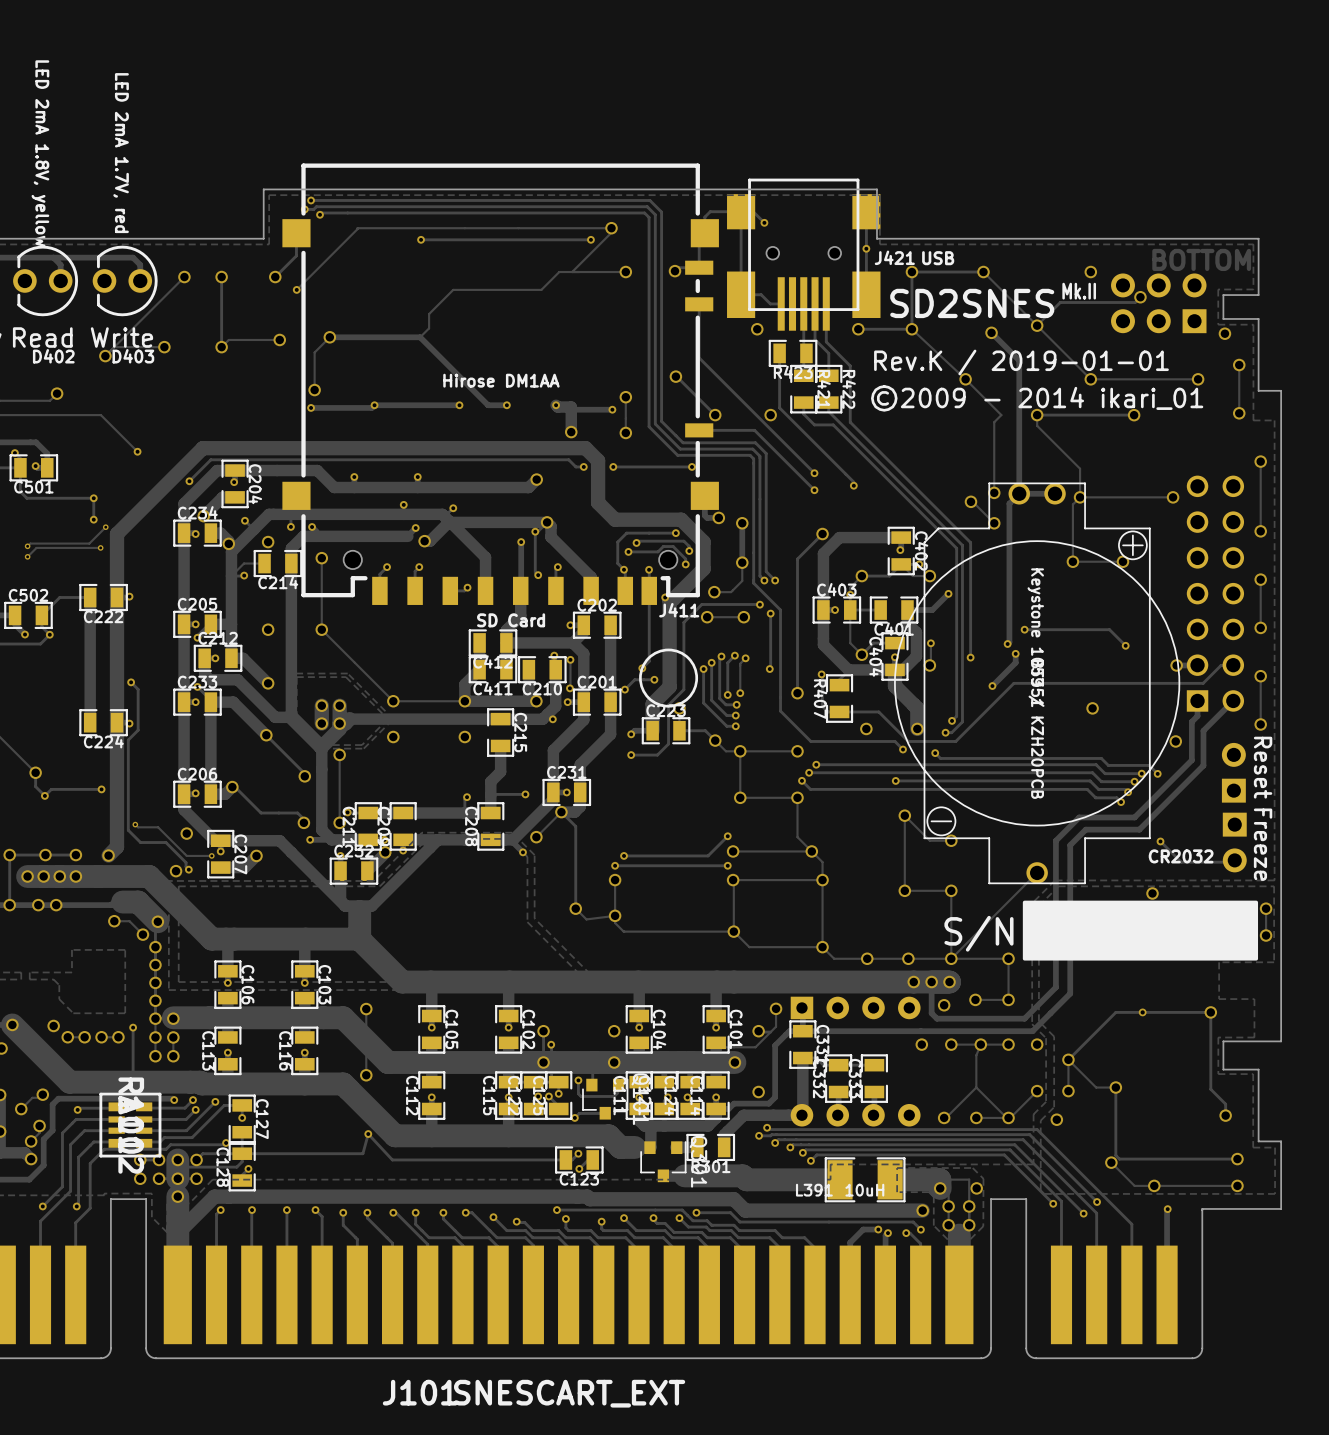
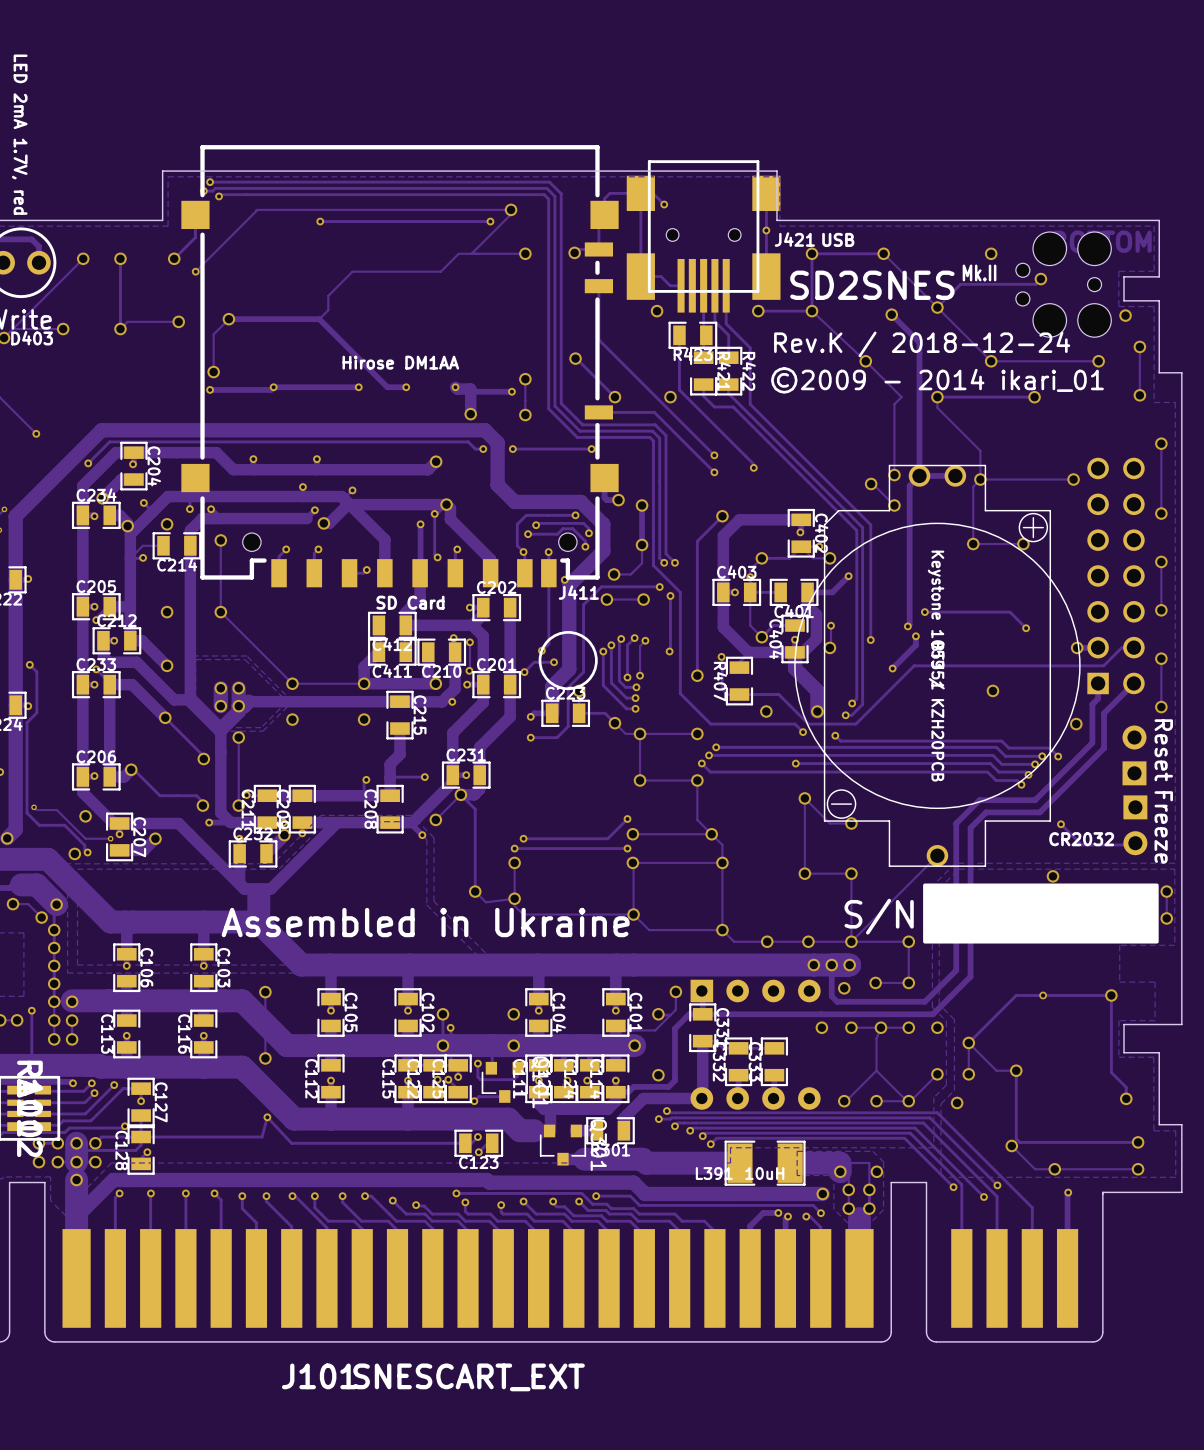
part footprint: [1111, 273, 1207, 334] -> [1015, 232, 1112, 338]
text: Rev.K / 2019-01-01 (1021, 362) -> Rev.K / 2018-12-24 (922, 344)
text: none -> Assembled in Ukraine (425, 922)

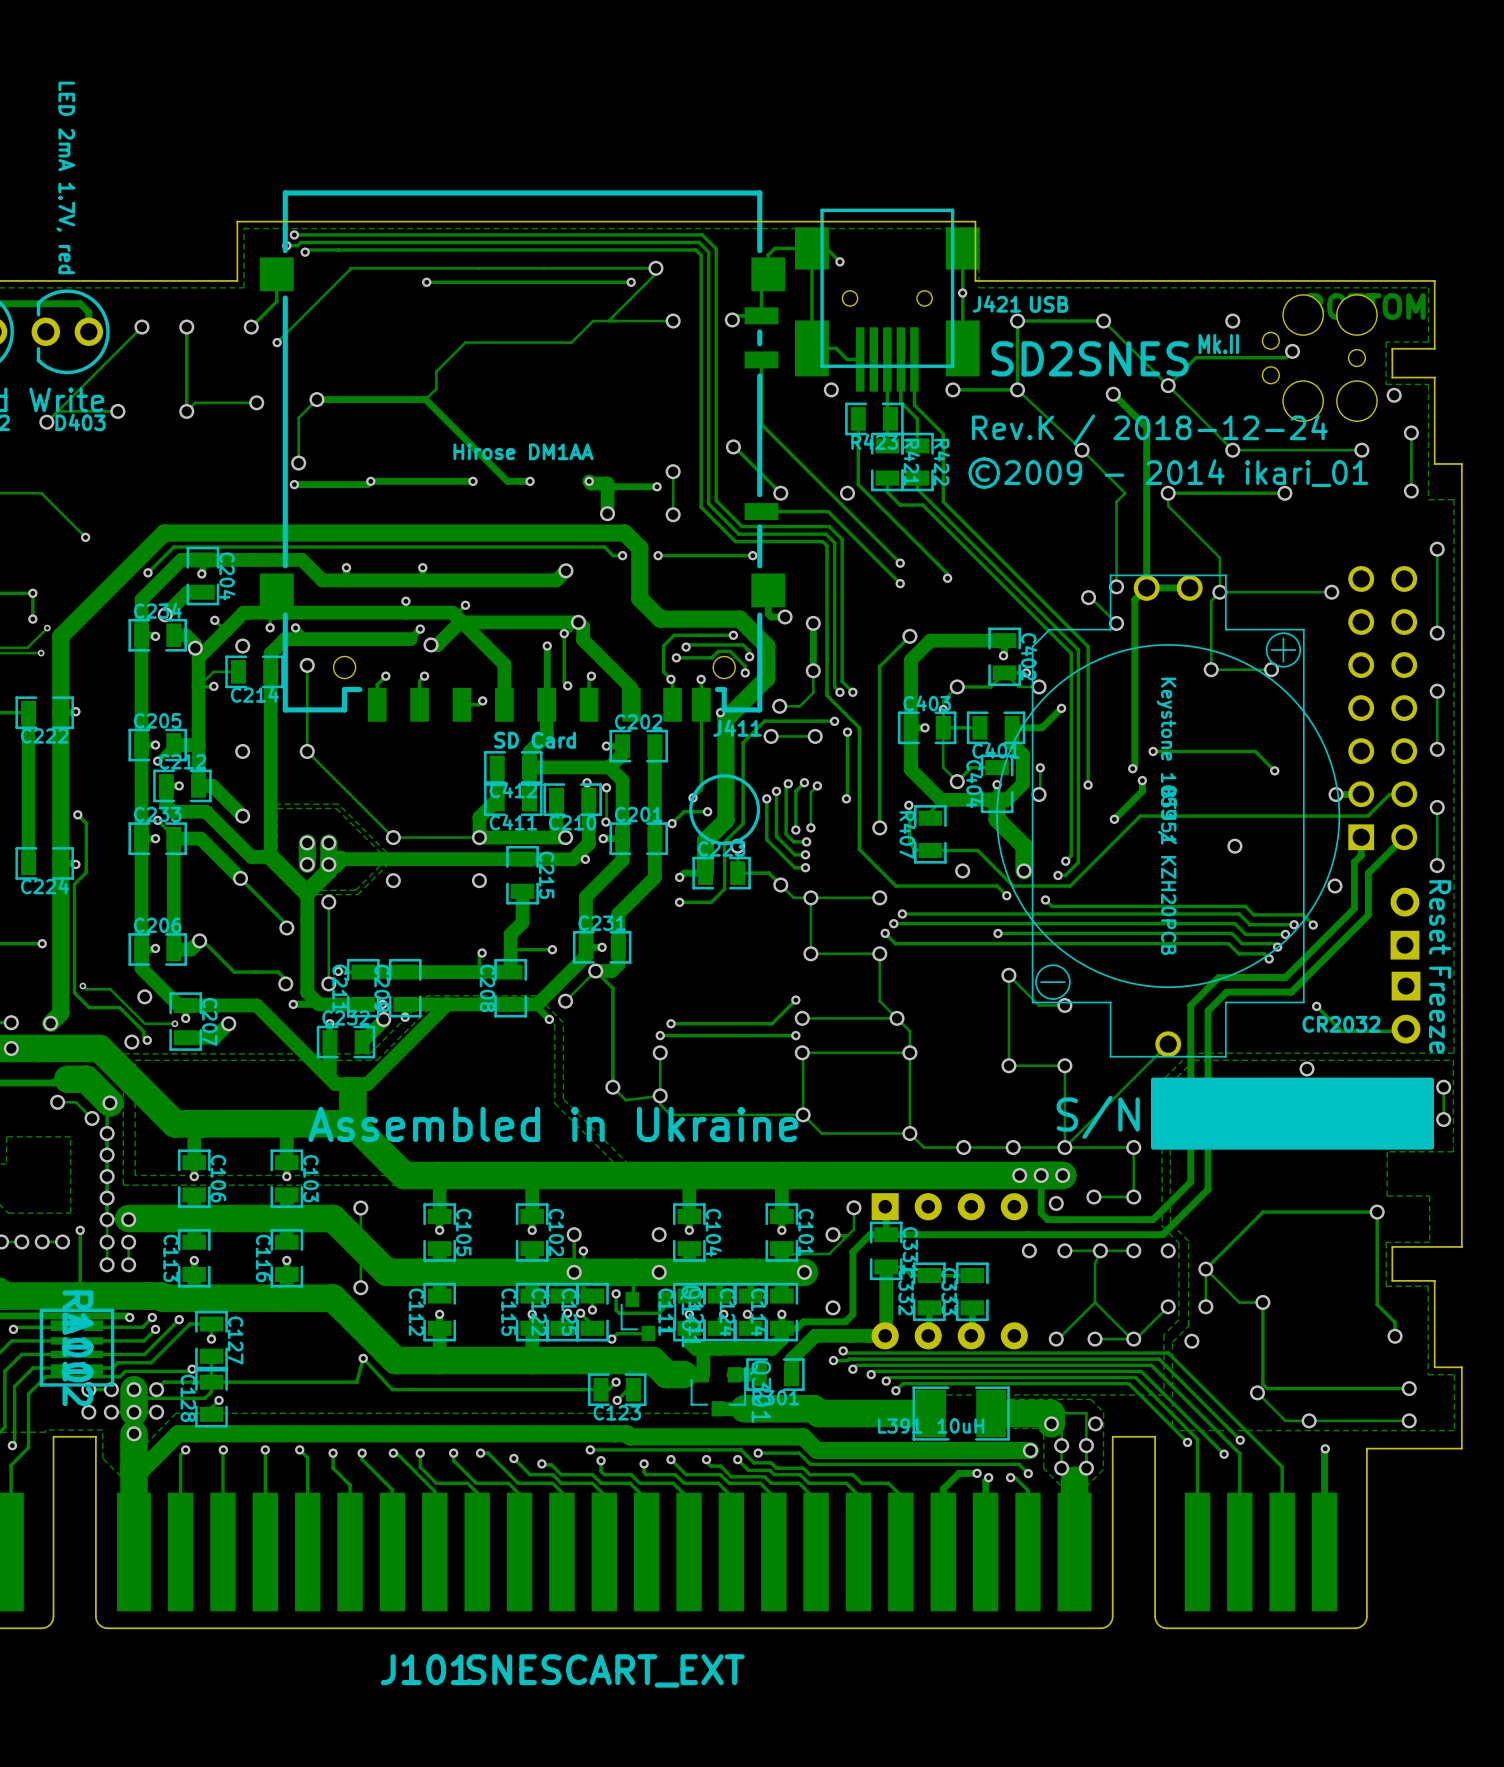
via: (1043, 995) -> none

